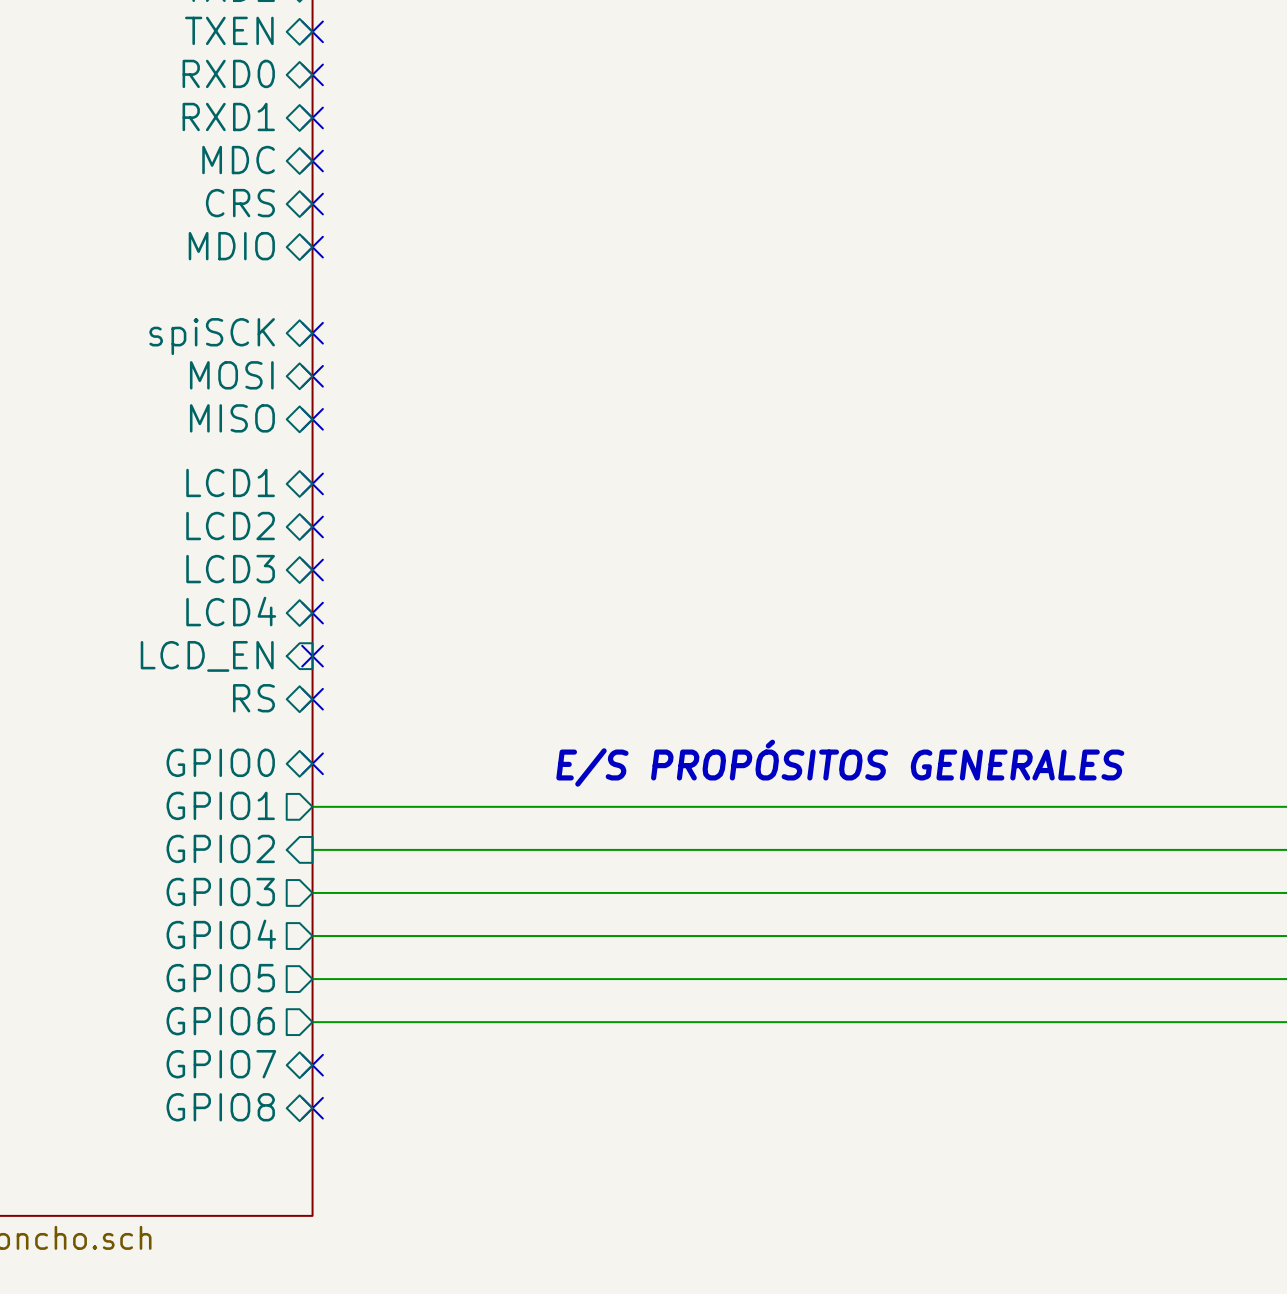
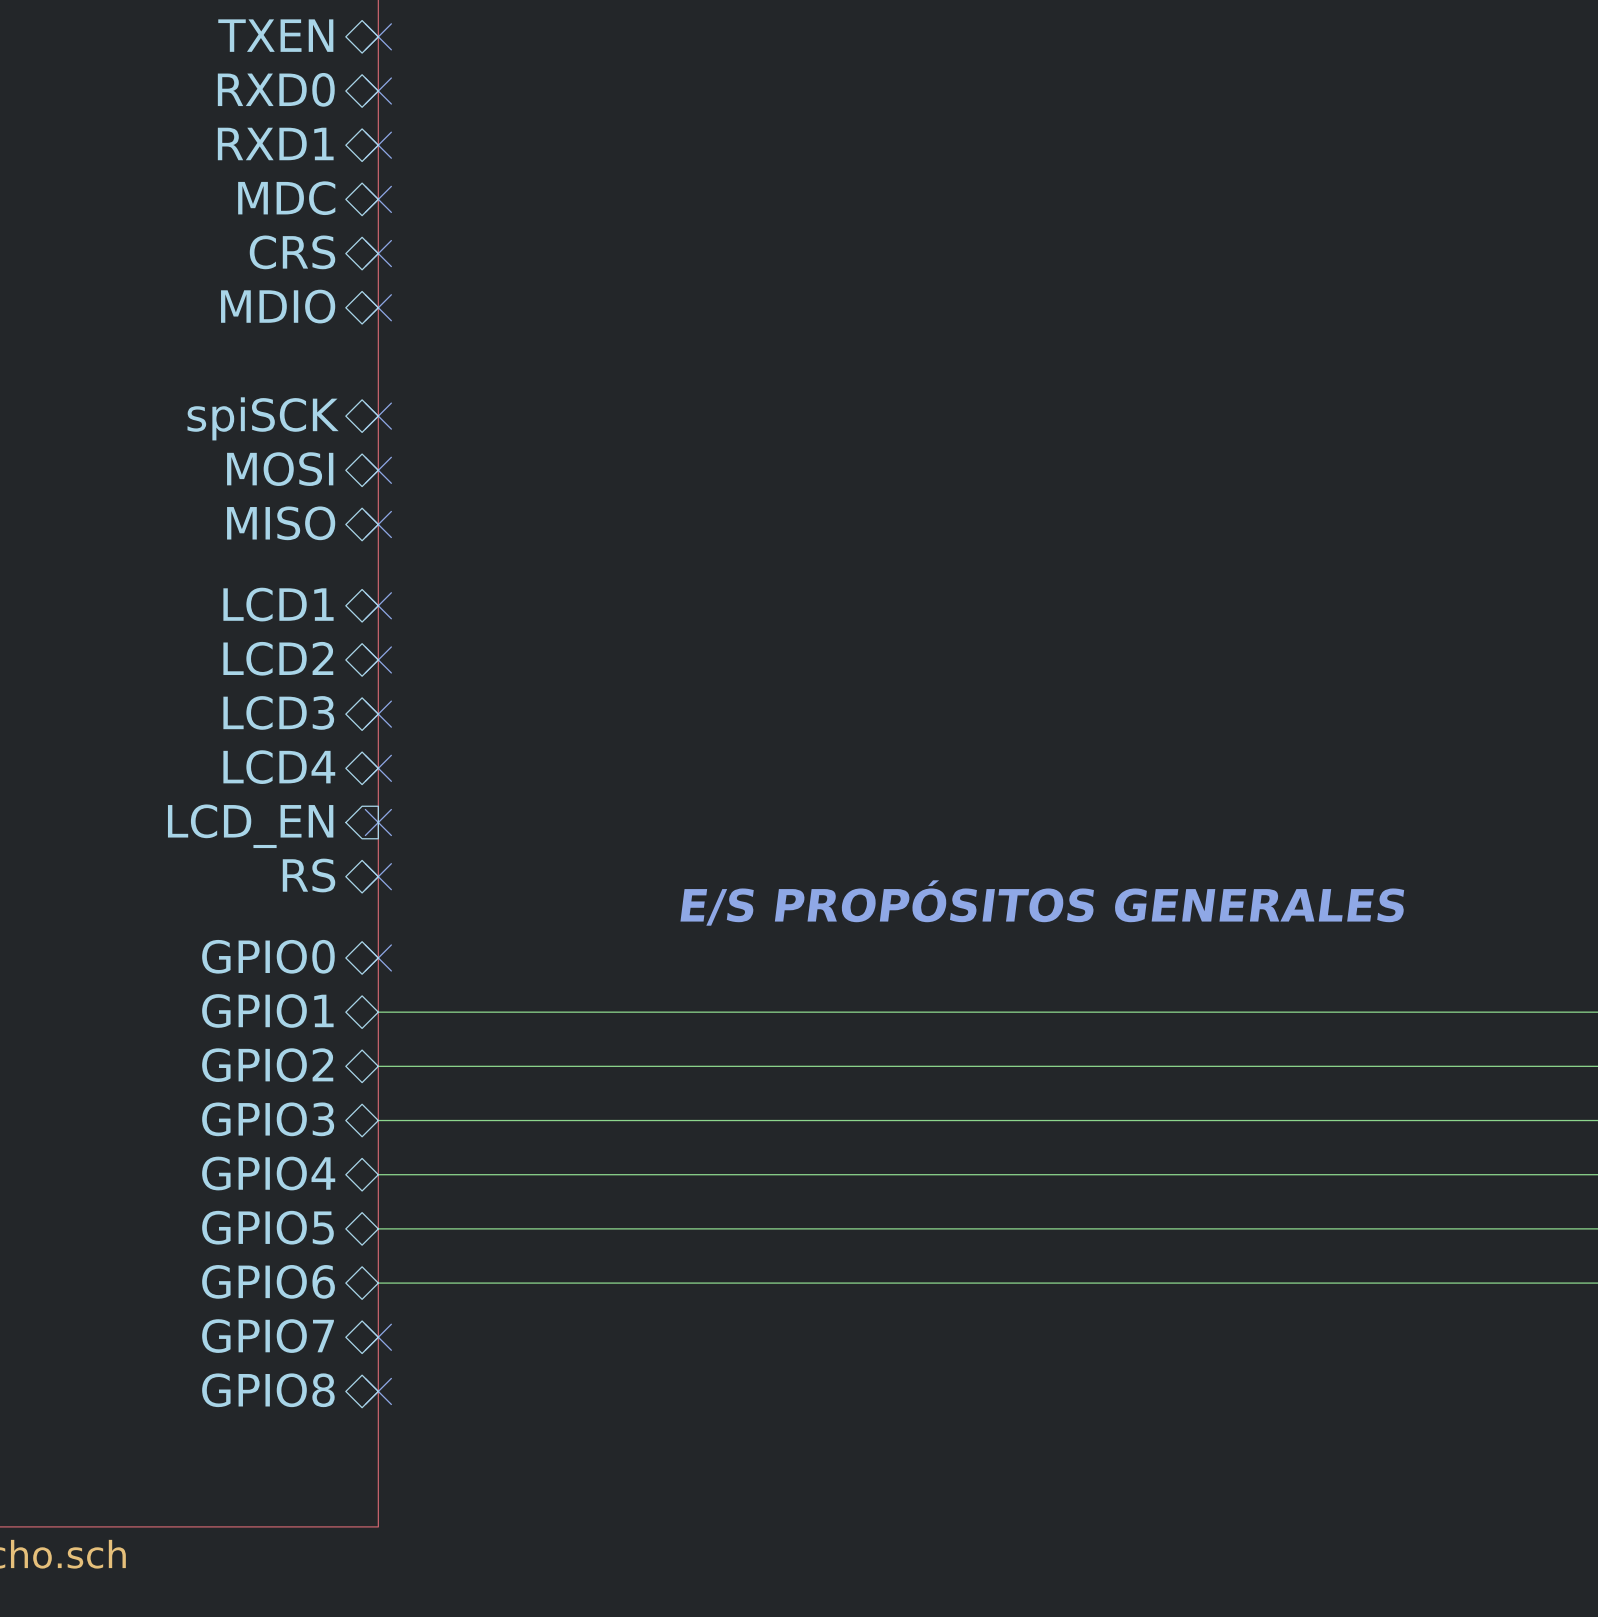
text position: E/S PROPÓSITOS GENERALES (840, 763) -> E/S PROPÓSITOS GENERALES (1042, 903)
sheet pin shape: output (220, 805) -> bidirectional (267, 1010)
sheet pin shape: input (220, 848) -> bidirectional (267, 1065)
sheet pin shape: output (220, 891) -> bidirectional (268, 1119)
sheet pin shape: output (221, 934) -> bidirectional (268, 1173)
sheet pin shape: output (220, 978) -> bidirectional (267, 1227)
sheet pin shape: output (220, 1021) -> bidirectional (268, 1281)

